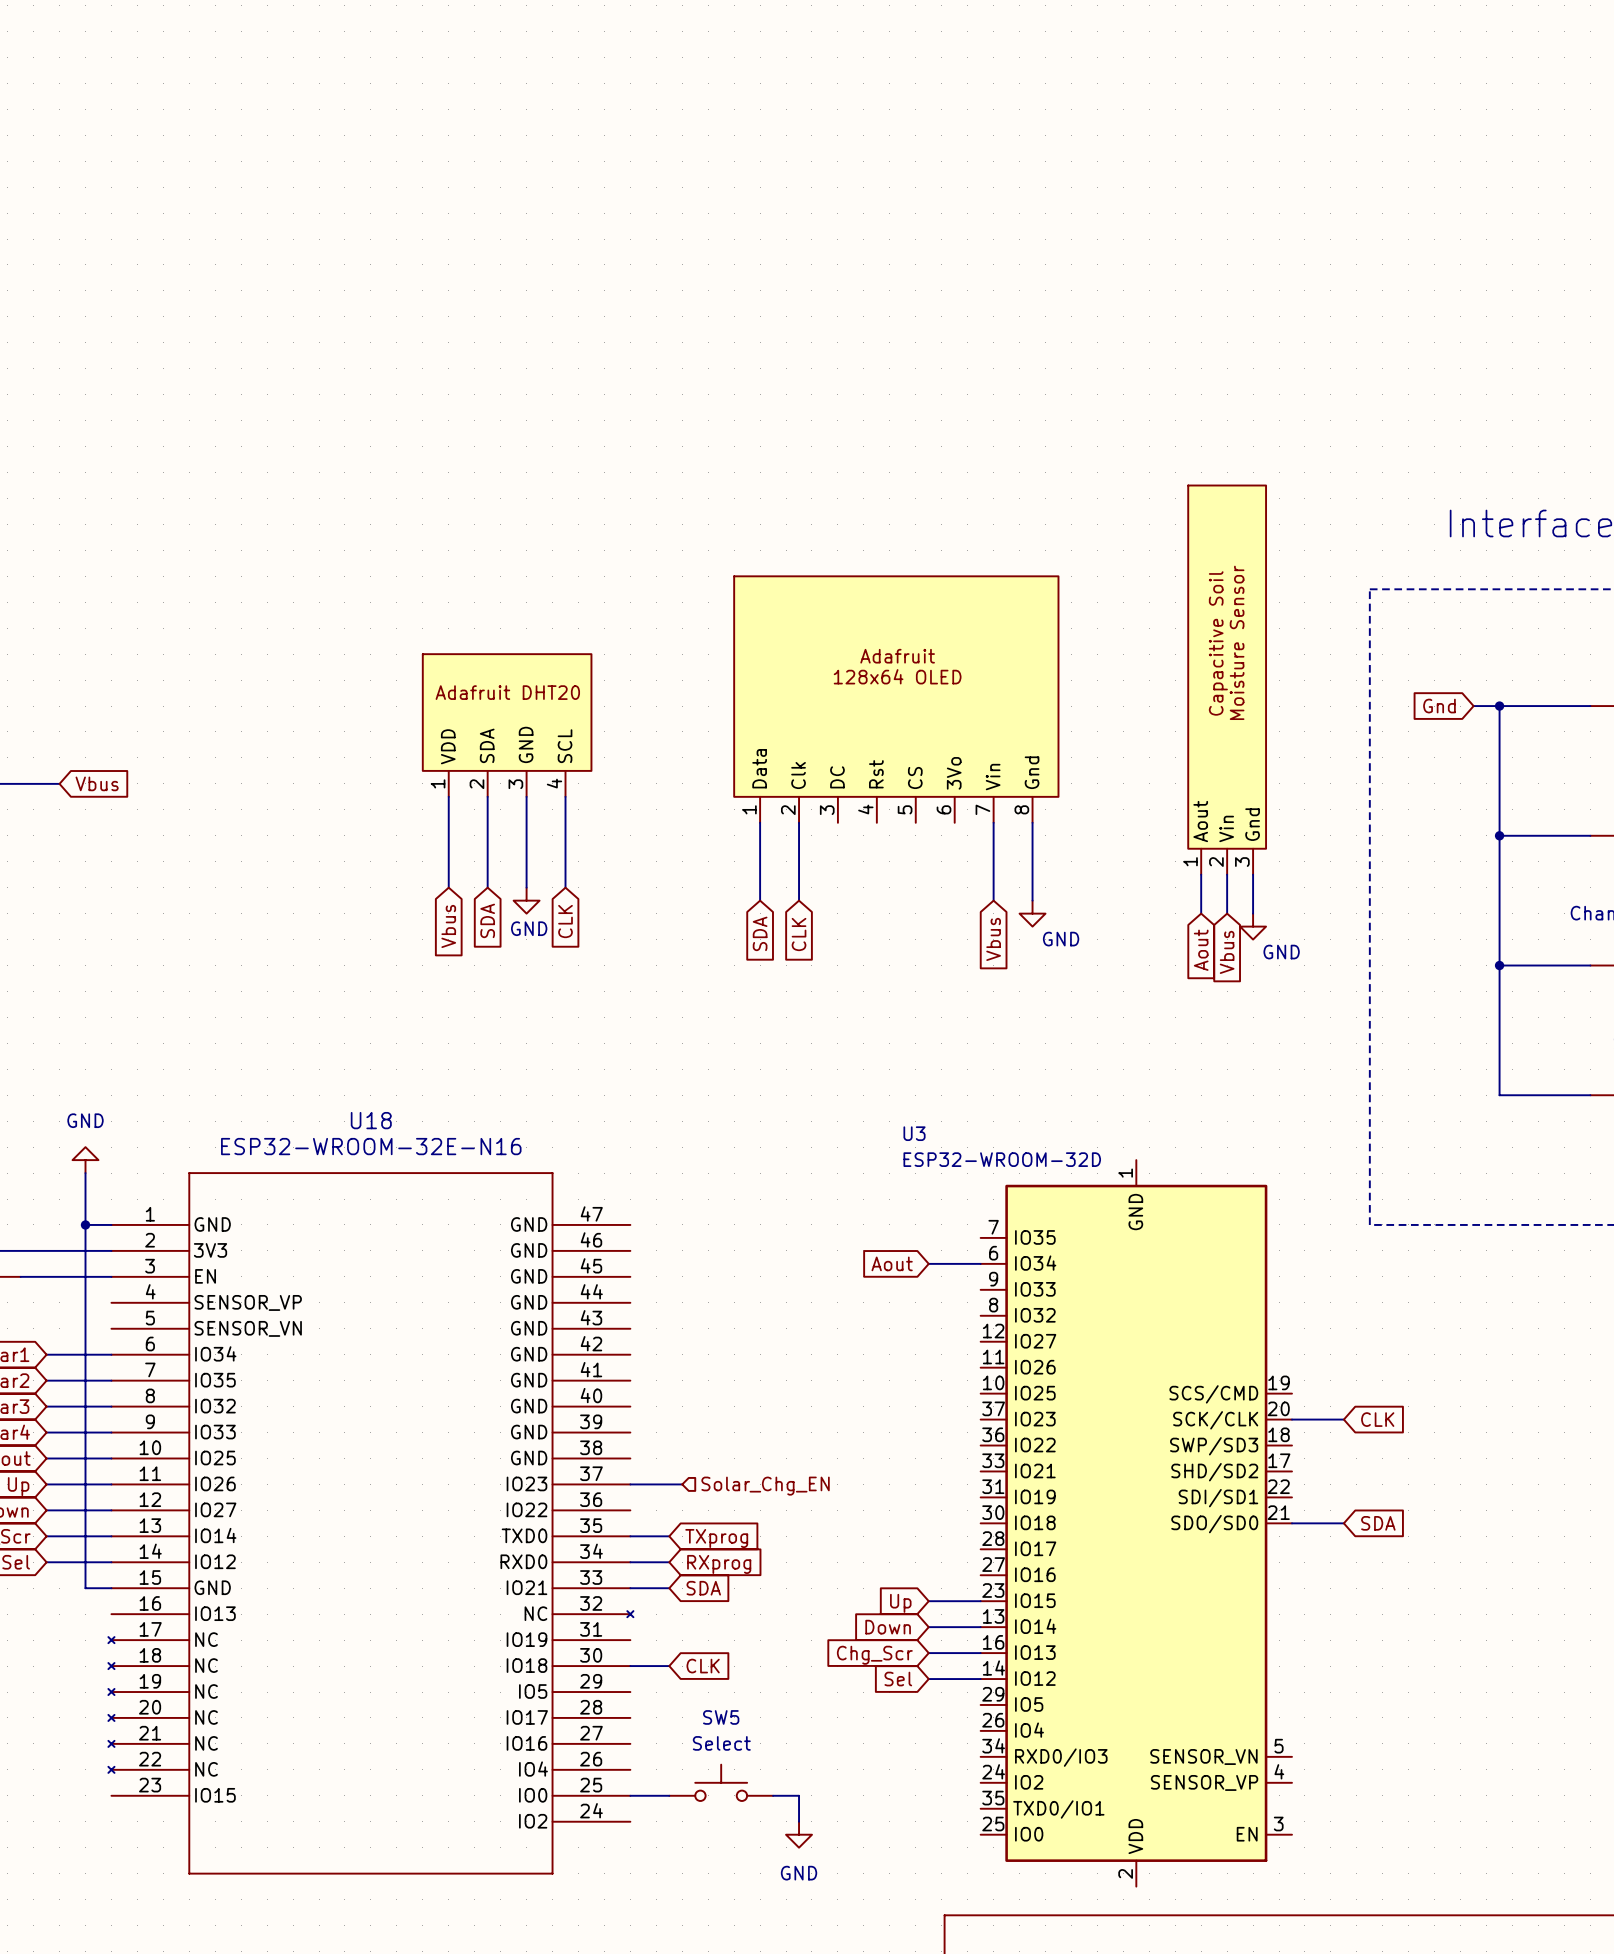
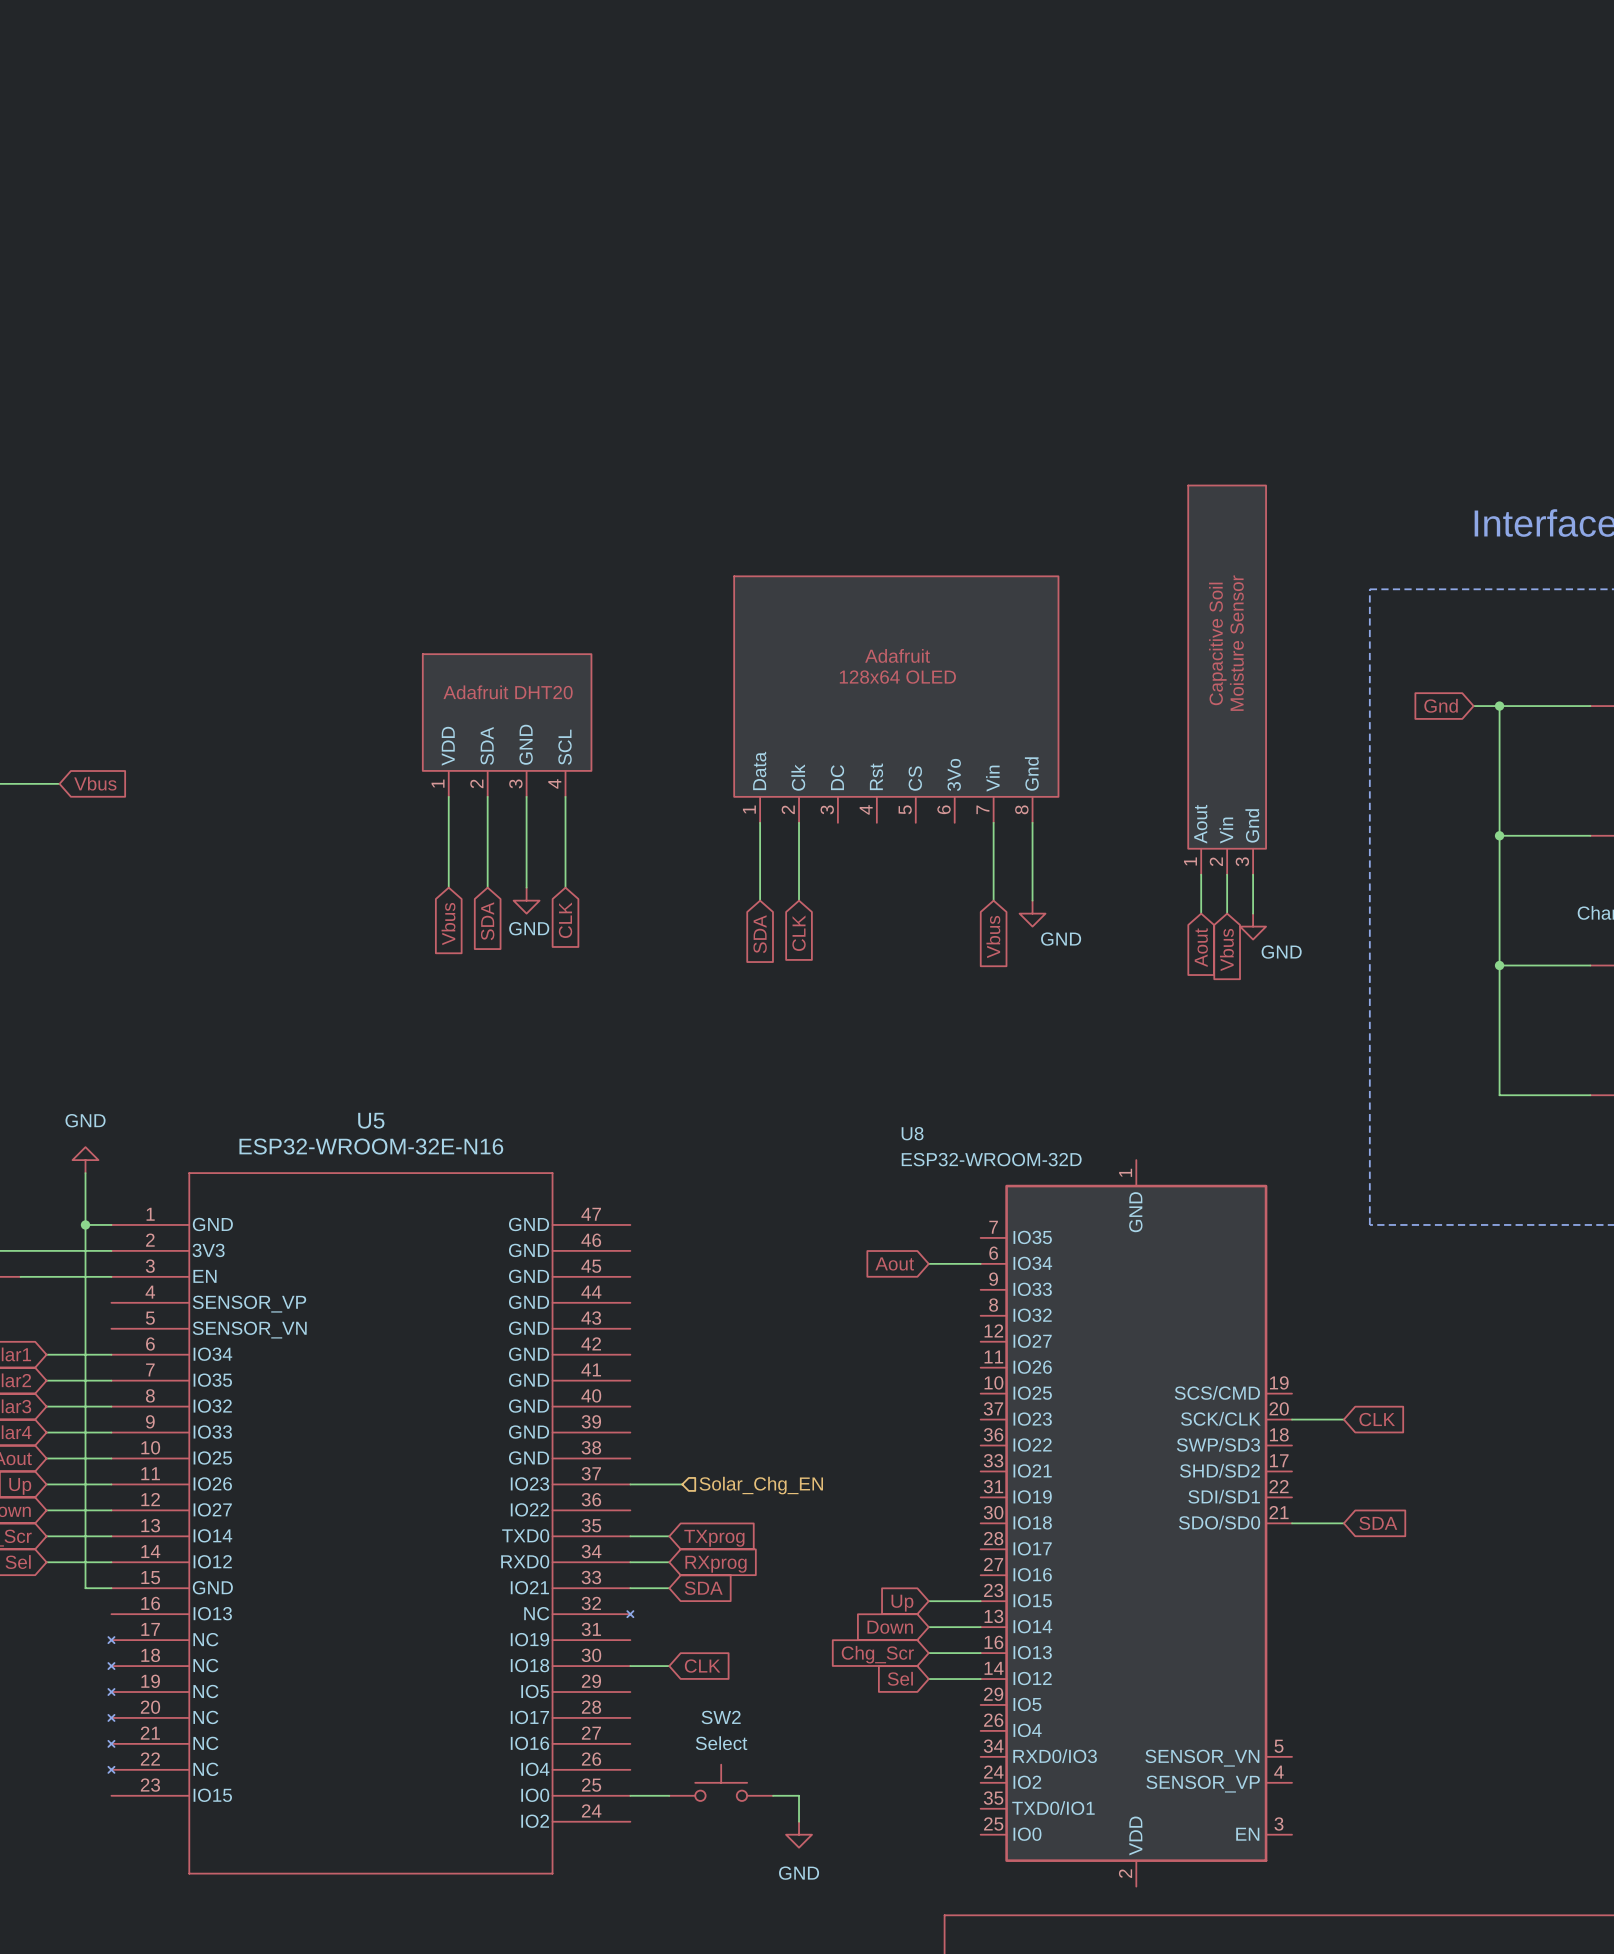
U18 name: U18 (371, 1120) -> U5 (371, 1120)
U3 name: U3 (914, 1133) -> U8 (912, 1133)
SW5 name: SW5 (721, 1717) -> SW2 (721, 1717)

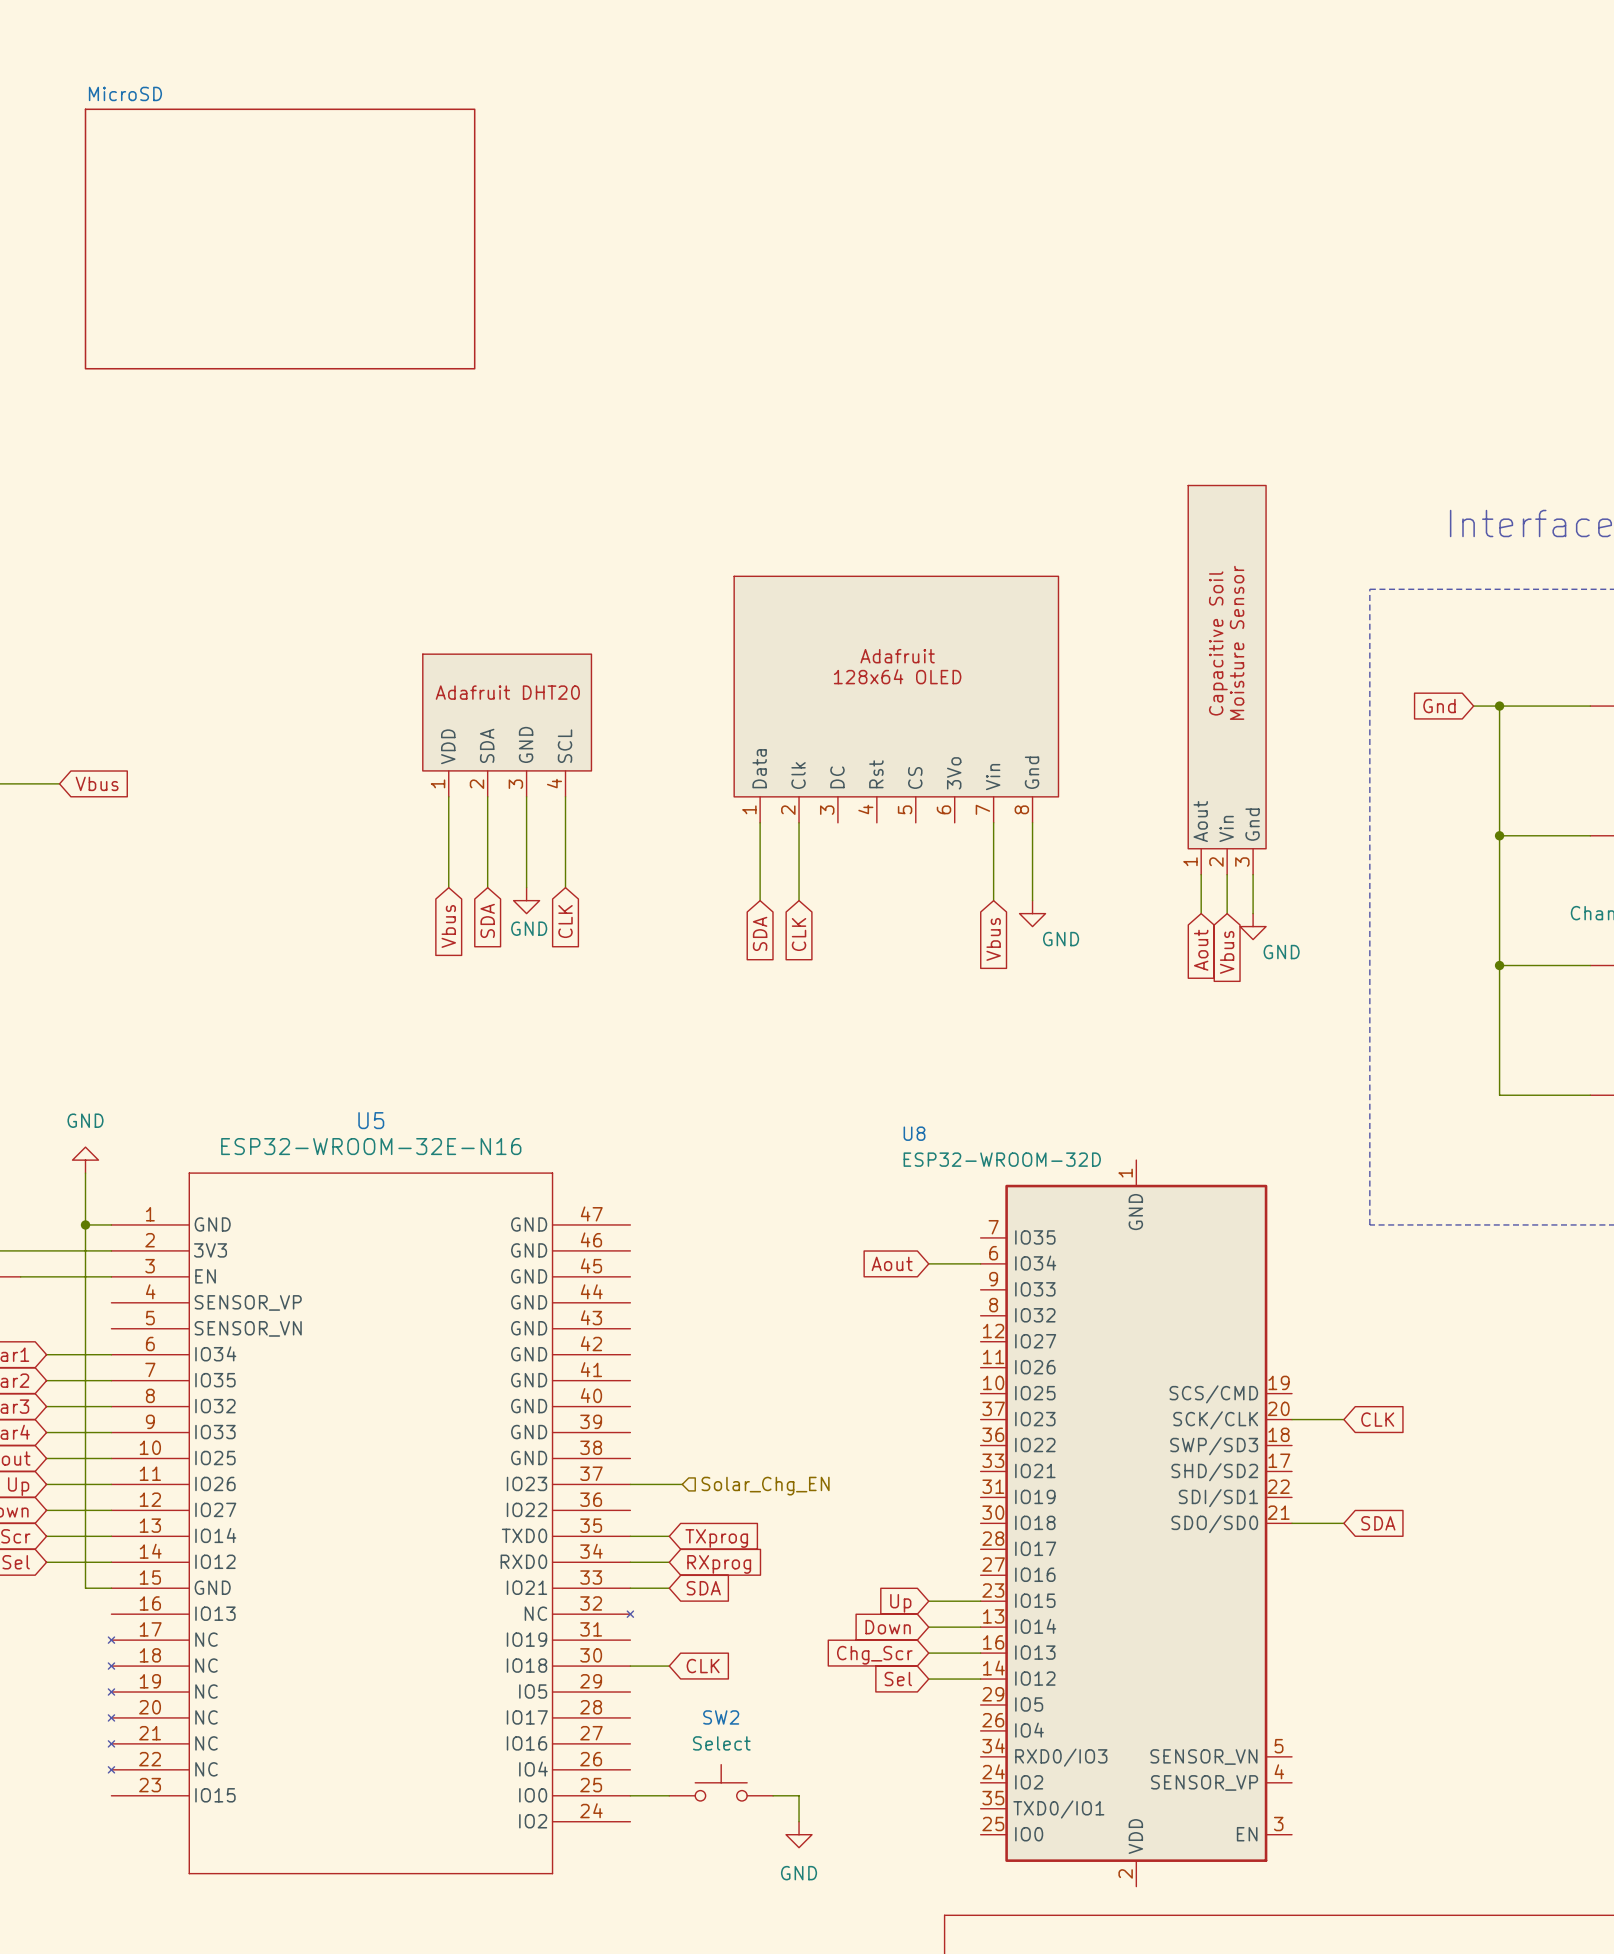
sheet MicroSD: none -> (280, 239)

